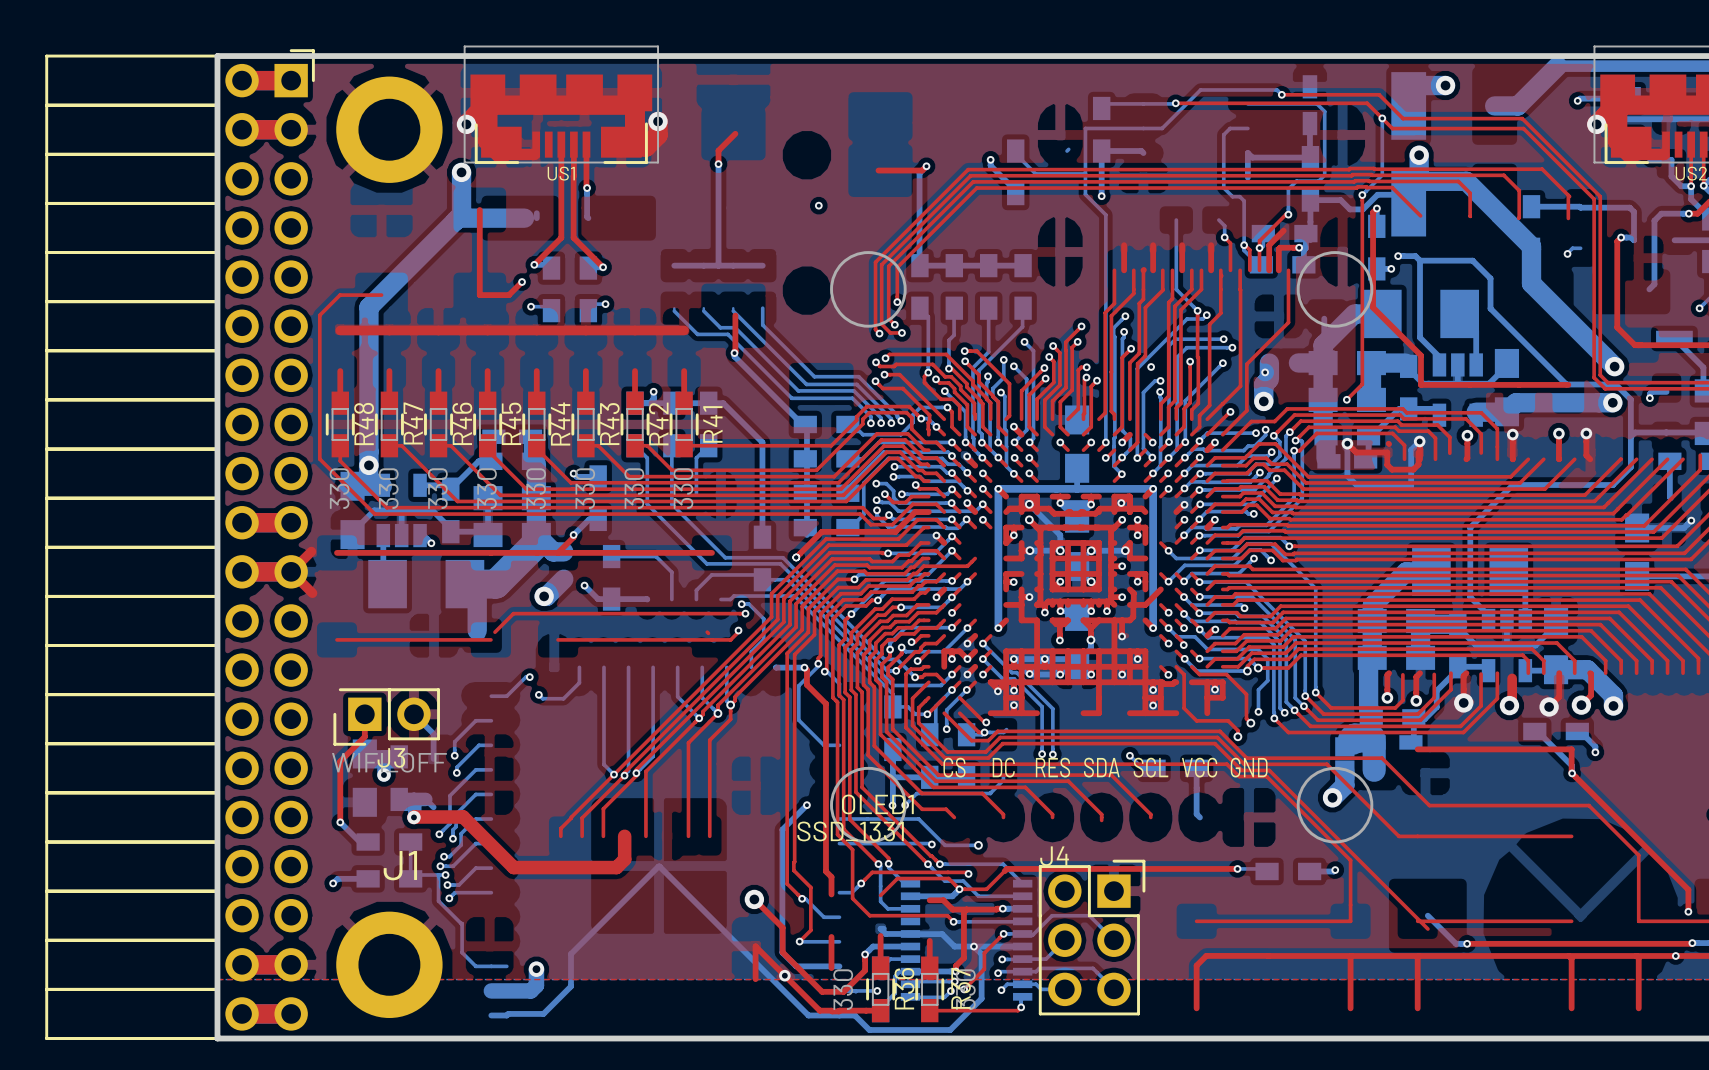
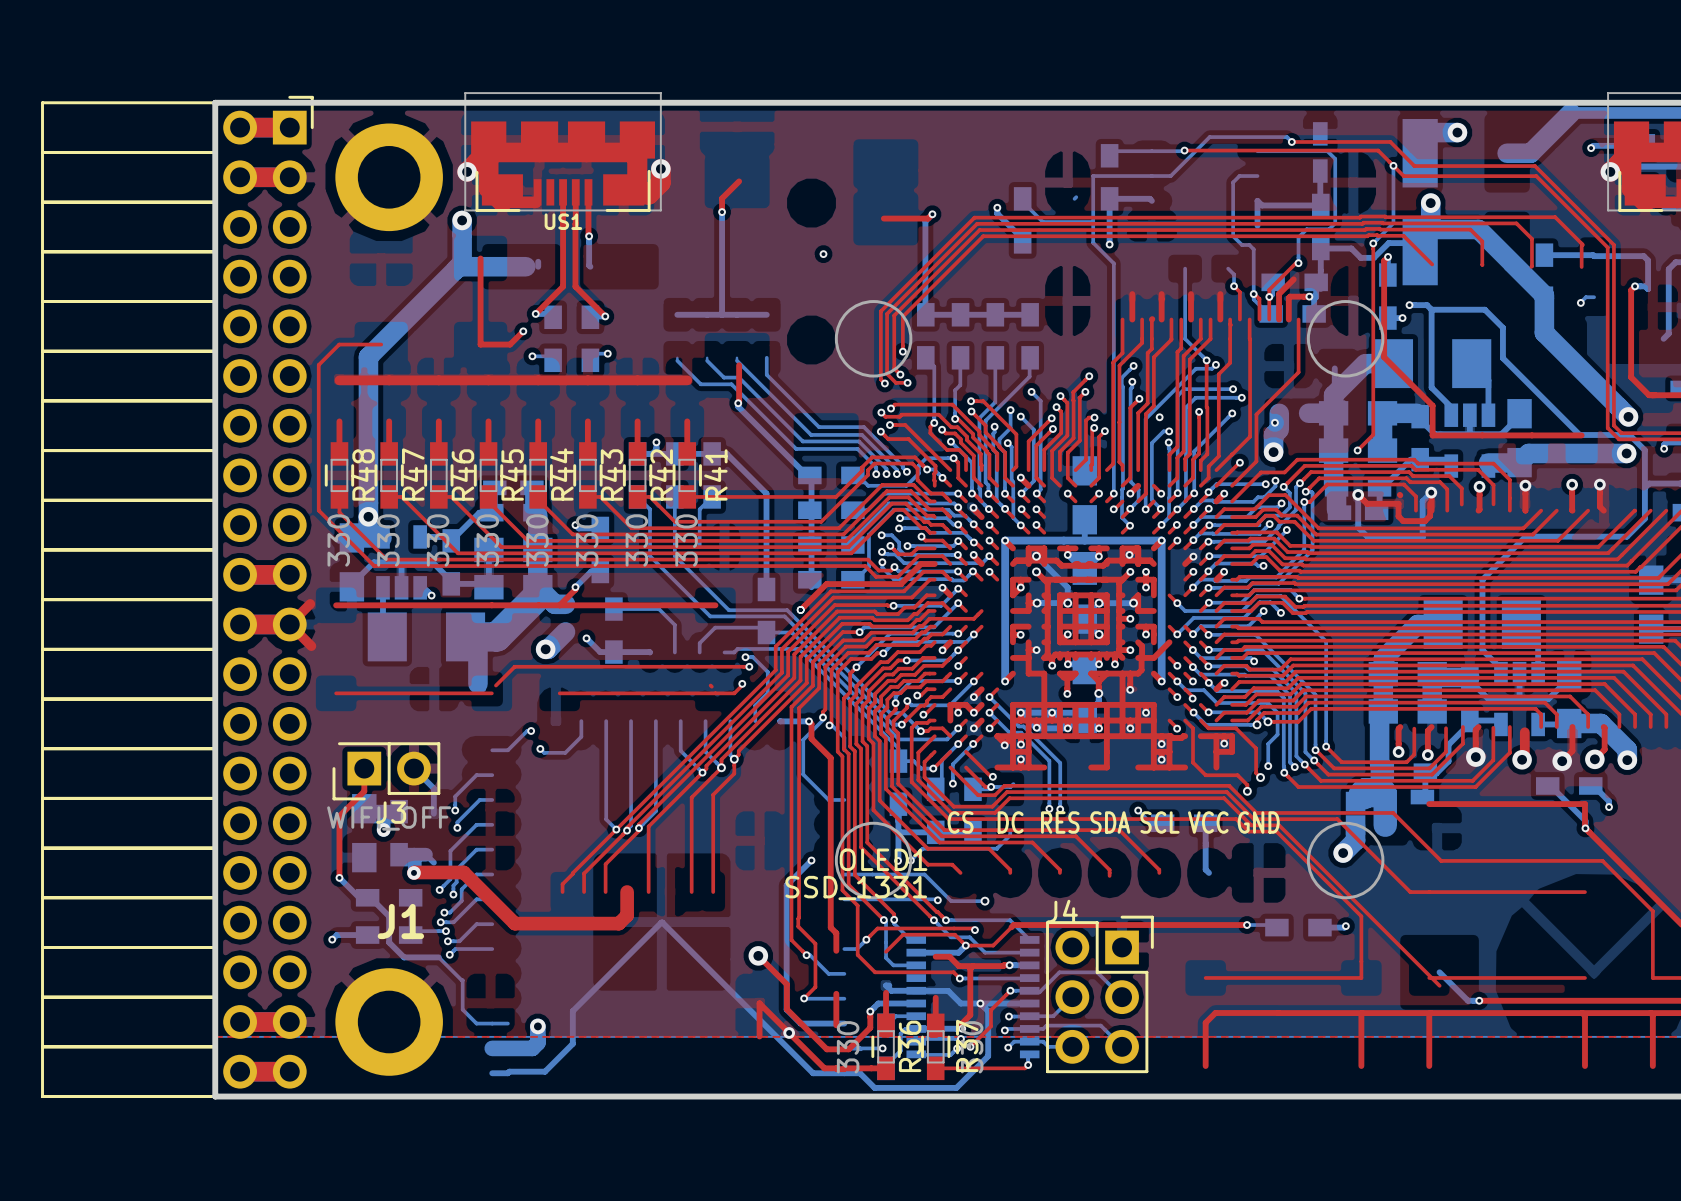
bottom track: (438, 875) (438, 900) -> (367, 897) (370, 897) (389, 916) (389, 942) (404, 957) (438, 957)

